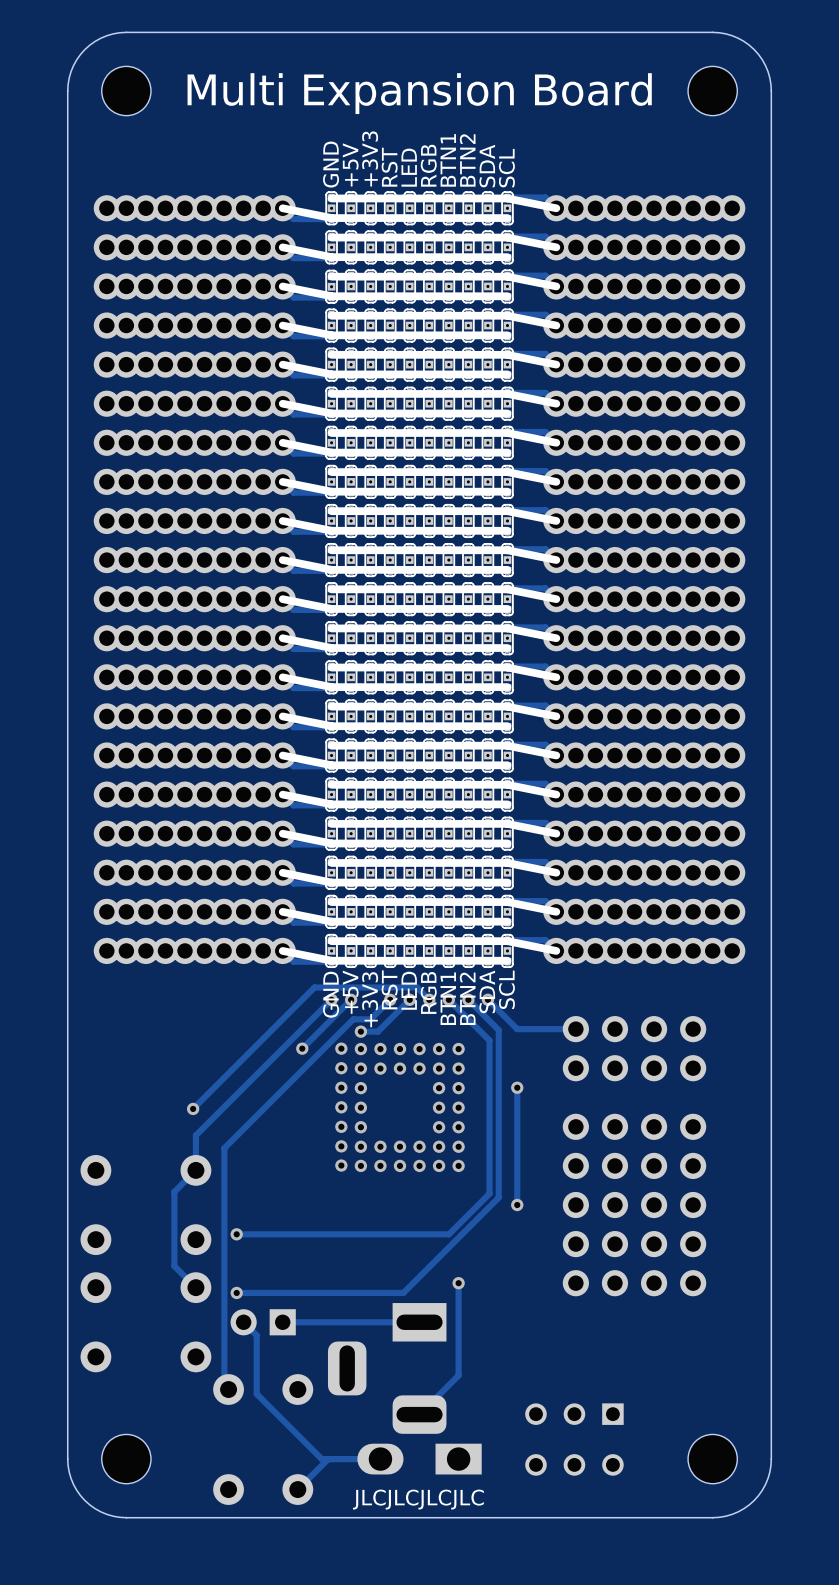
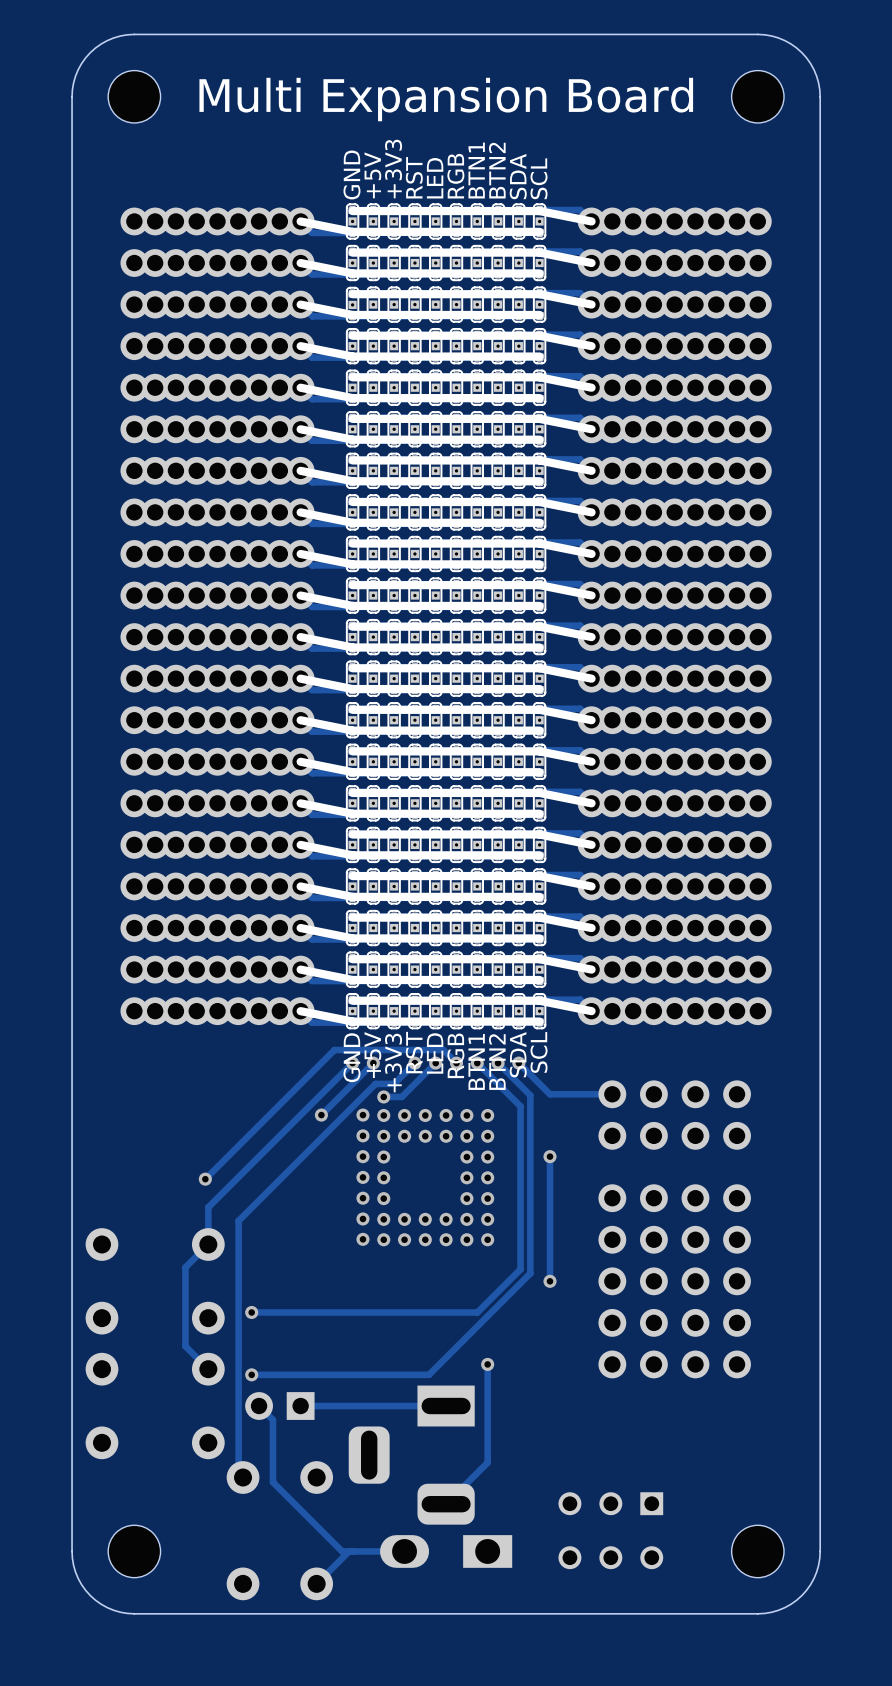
part: (106, 579) -> none
part: (732, 579) -> none
text: JLCJLCJLCJLC (418, 1499) -> none

